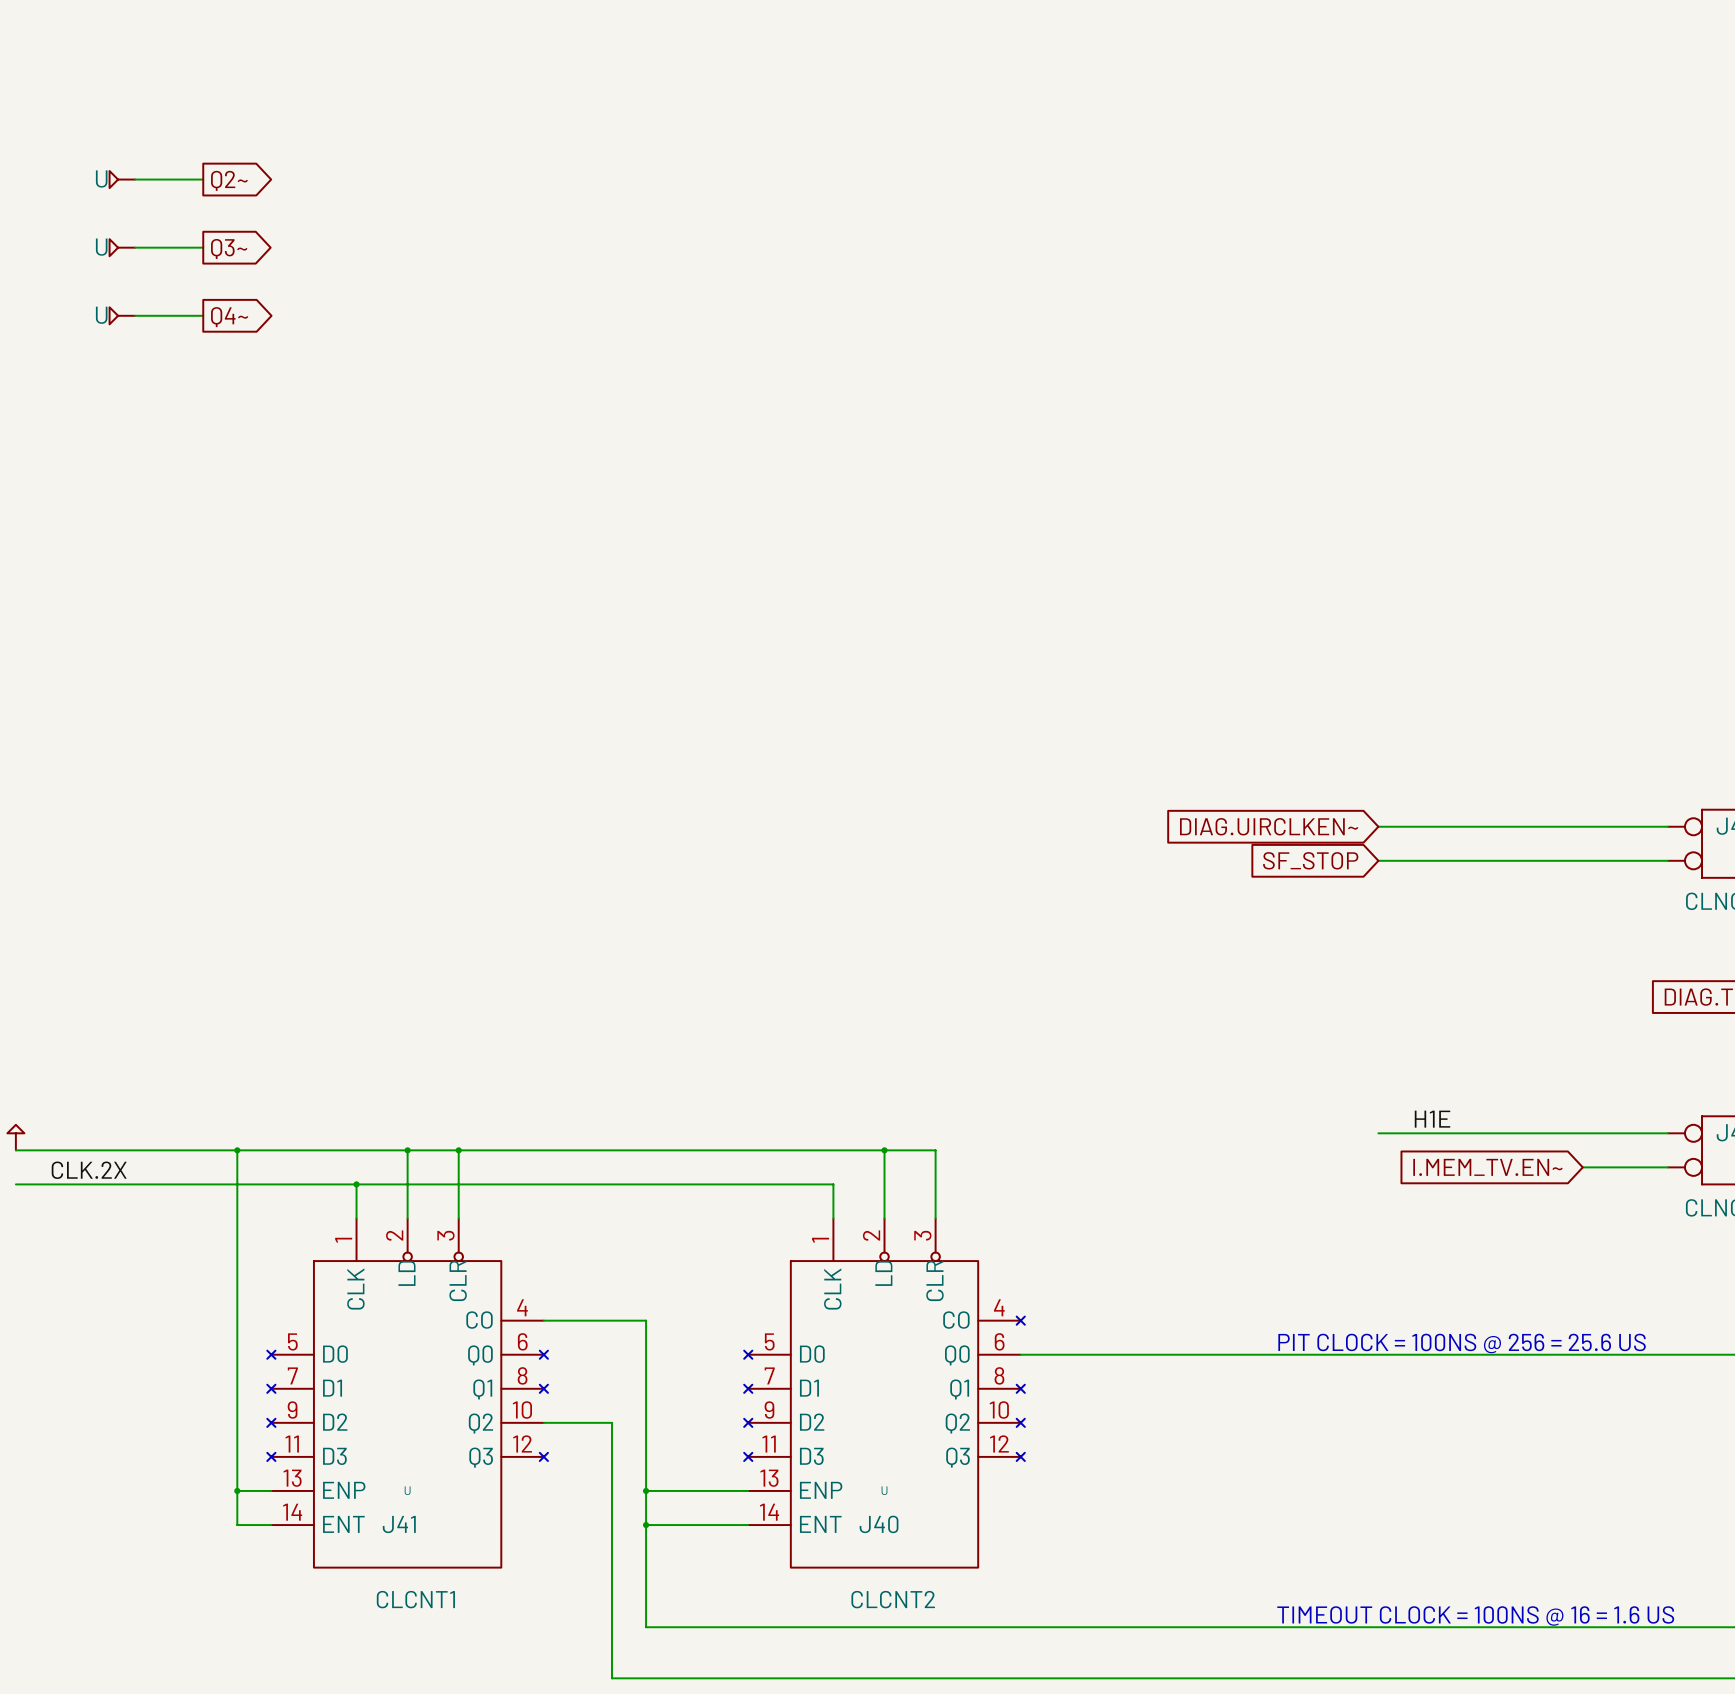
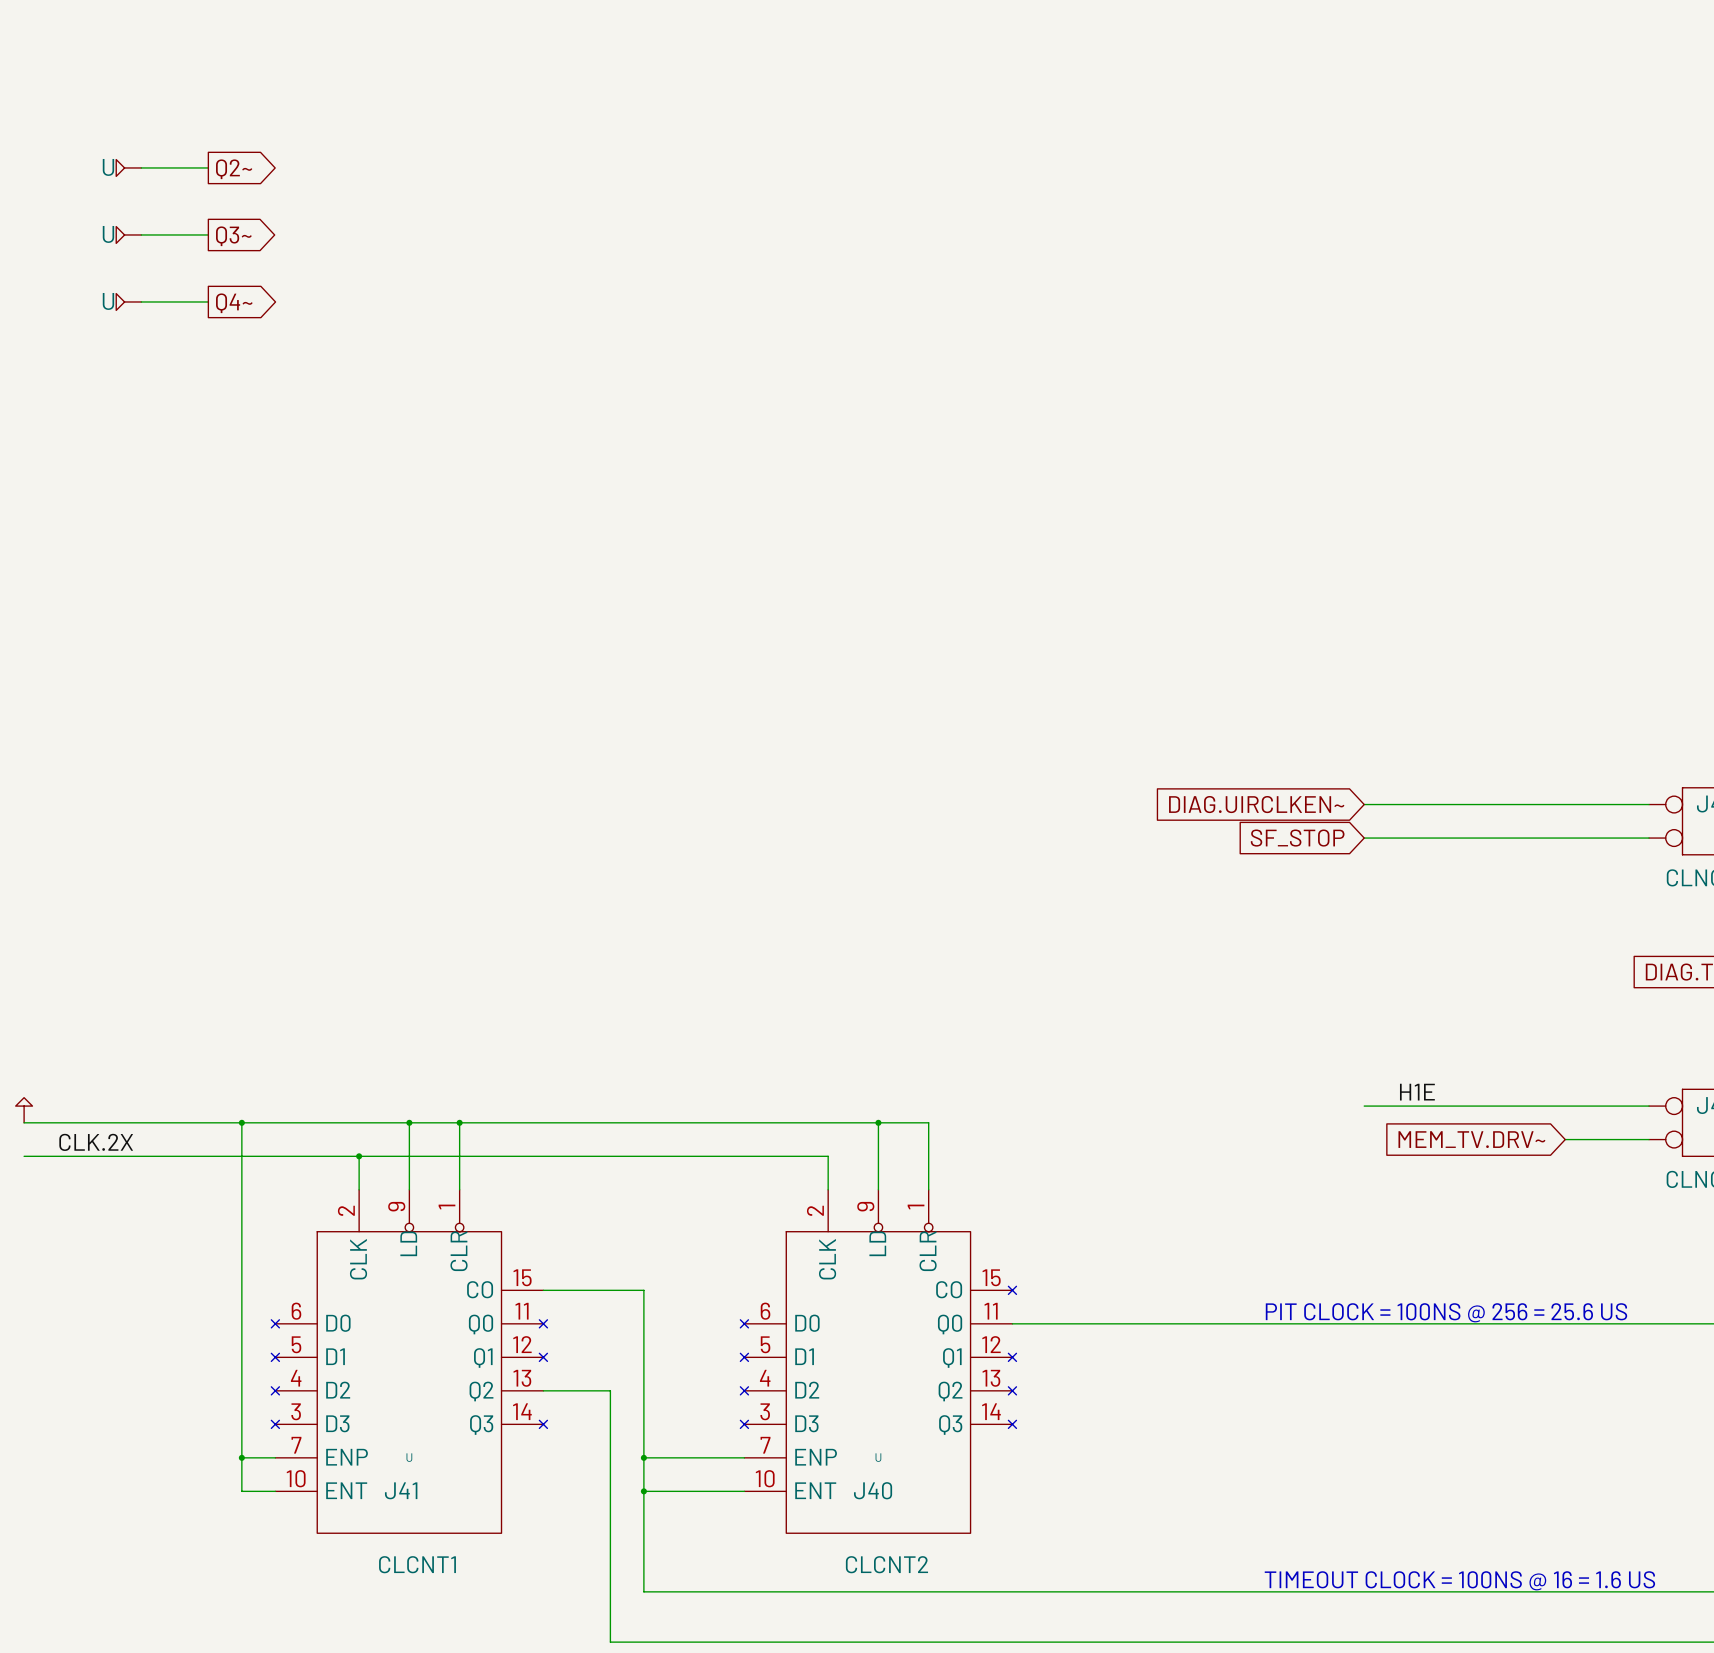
global label: I.MEM_TV.EN~ (1487, 1167) -> MEM_TV.DRV~ (1471, 1139)
U symbol: [271, 1218, 544, 1568] -> [275, 1189, 544, 1534]
U symbol: [748, 1218, 1021, 1568] -> [744, 1189, 1013, 1534]

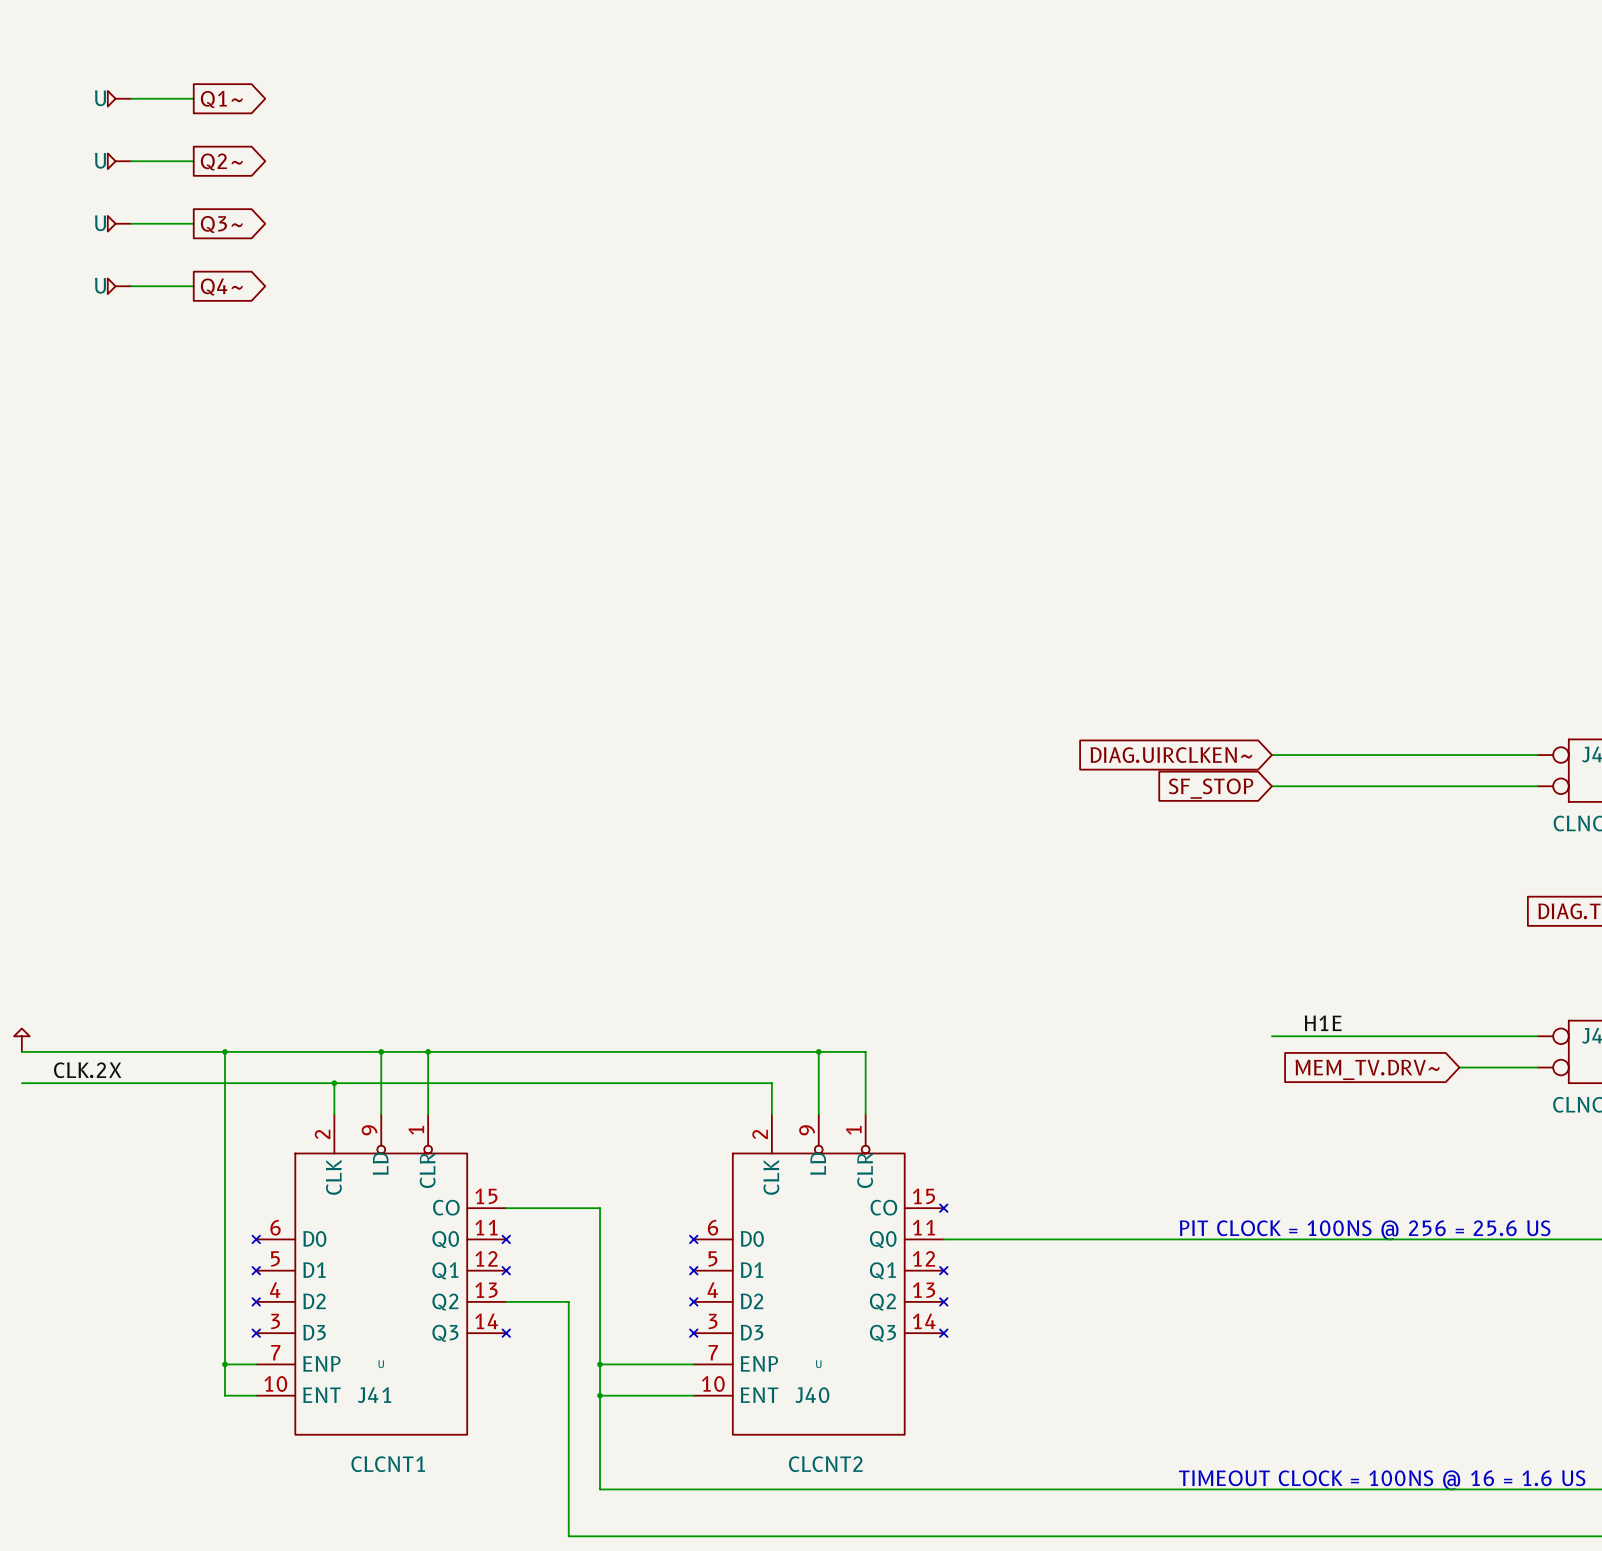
U: none -> (119, 98)
wire: none -> (131, 98) (193, 98)
global label: none -> Q1~ (221, 99)

